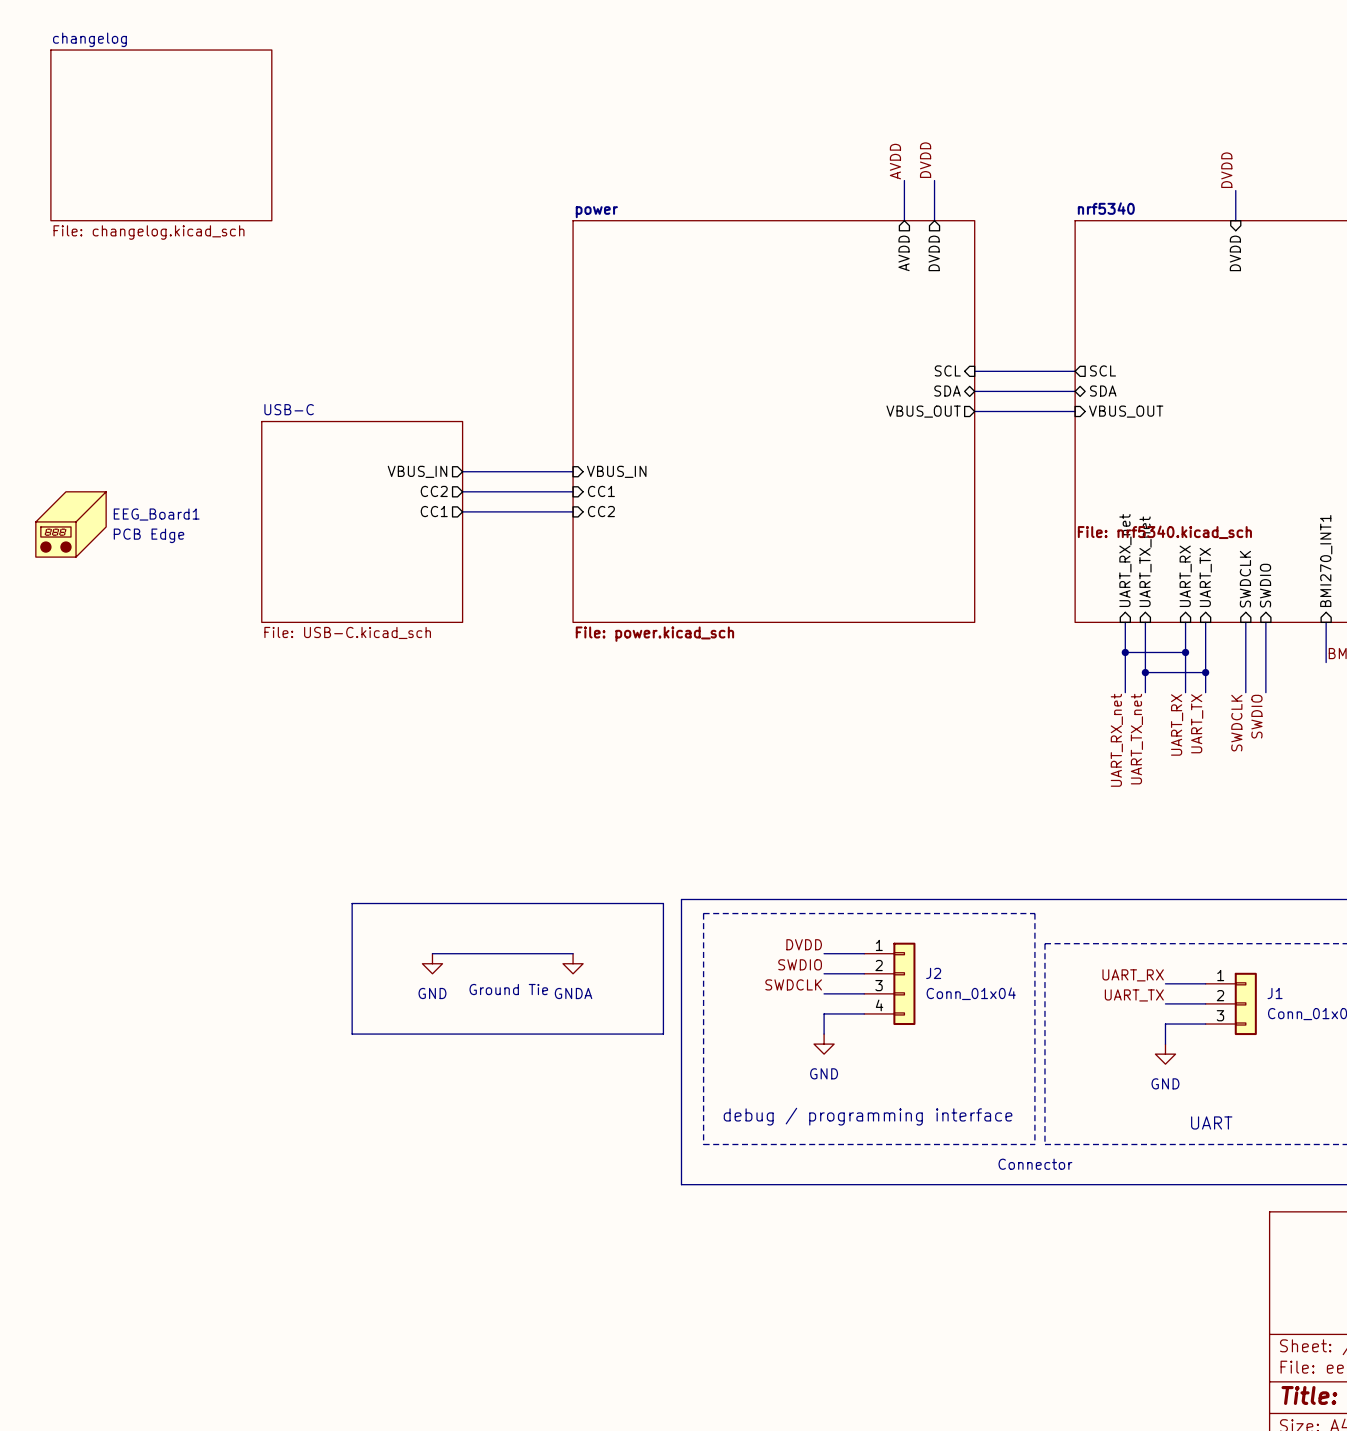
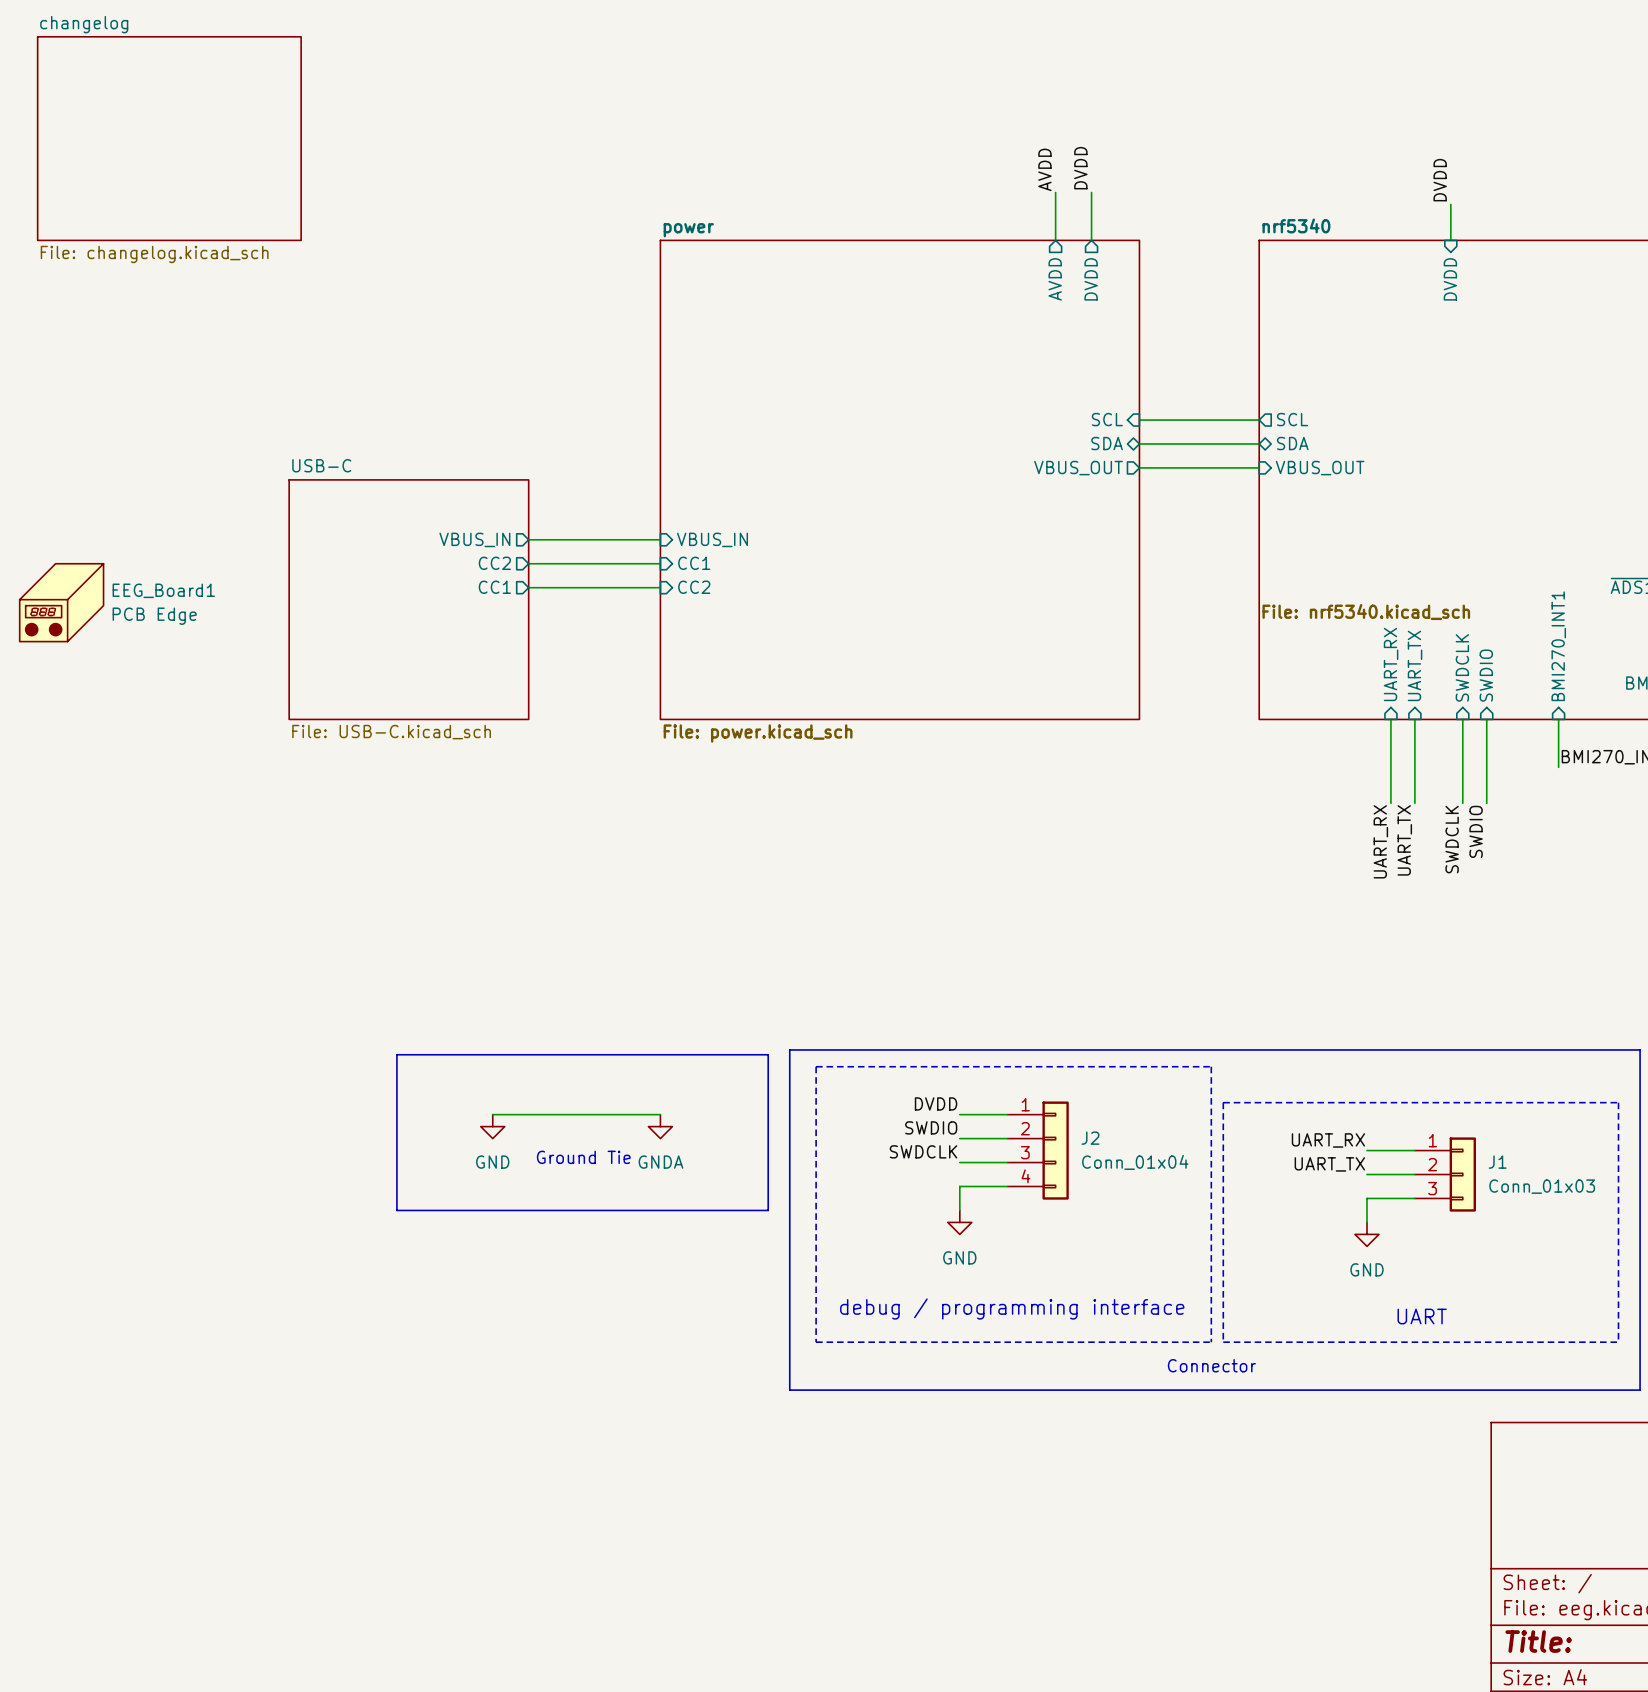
sheet pin: UART_RX_net (1125, 560) -> none
sheet pin: UART_TX_net (1145, 561) -> none
wire: (1125, 622) (1125, 692) -> none
wire: (1145, 622) (1145, 692) -> none
wire: (1125, 652) (1185, 652) -> none
junction: (1125, 652) -> none
junction: (1185, 652) -> none
wire: (1145, 672) (1205, 672) -> none
junction: (1145, 672) -> none
junction: (1205, 672) -> none
label: UART_TX_net (1136, 739) -> none
label: UART_RX_net (1116, 740) -> none

